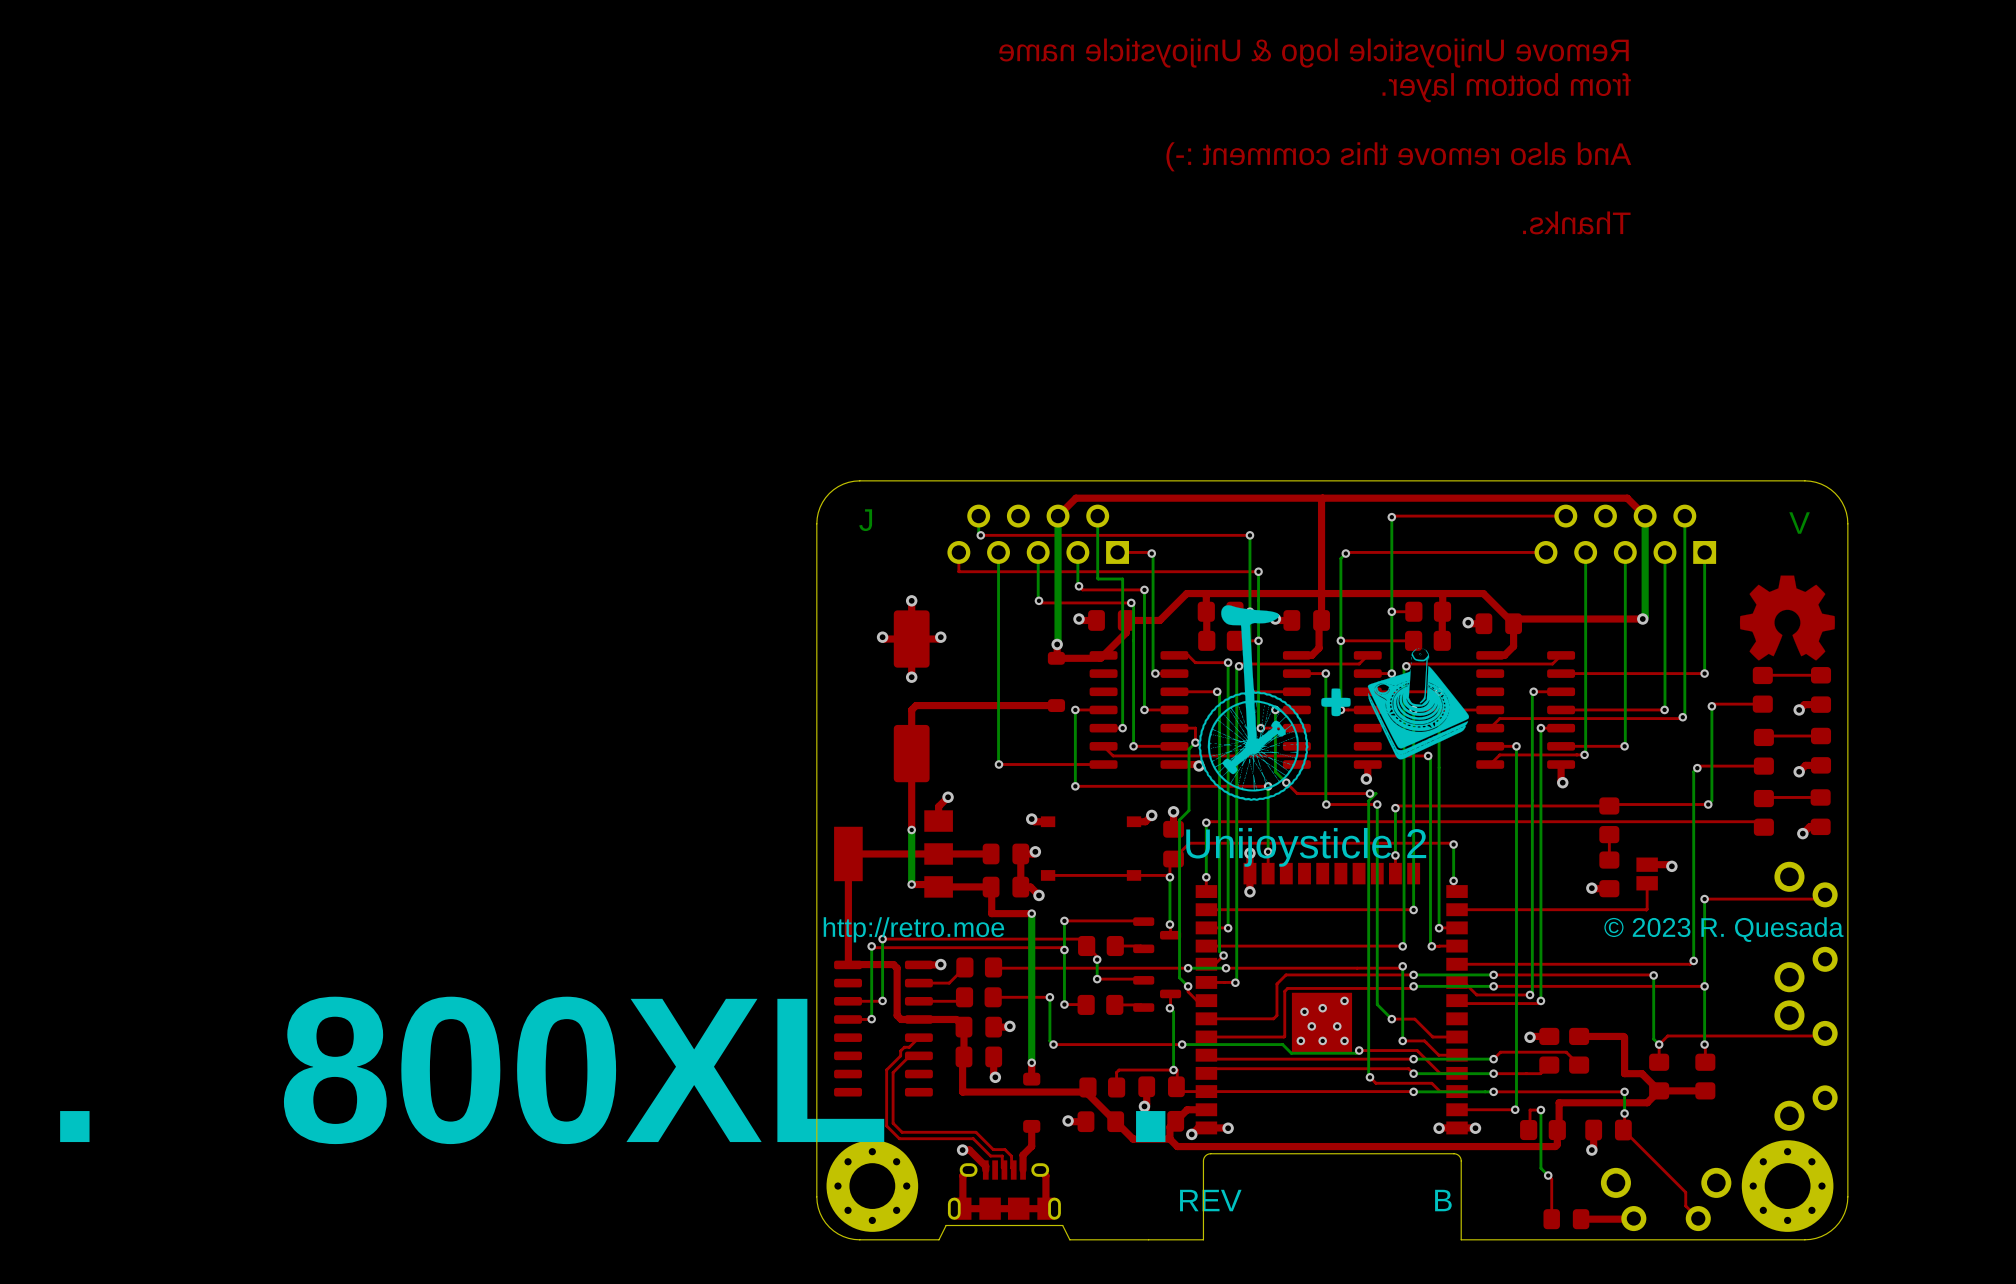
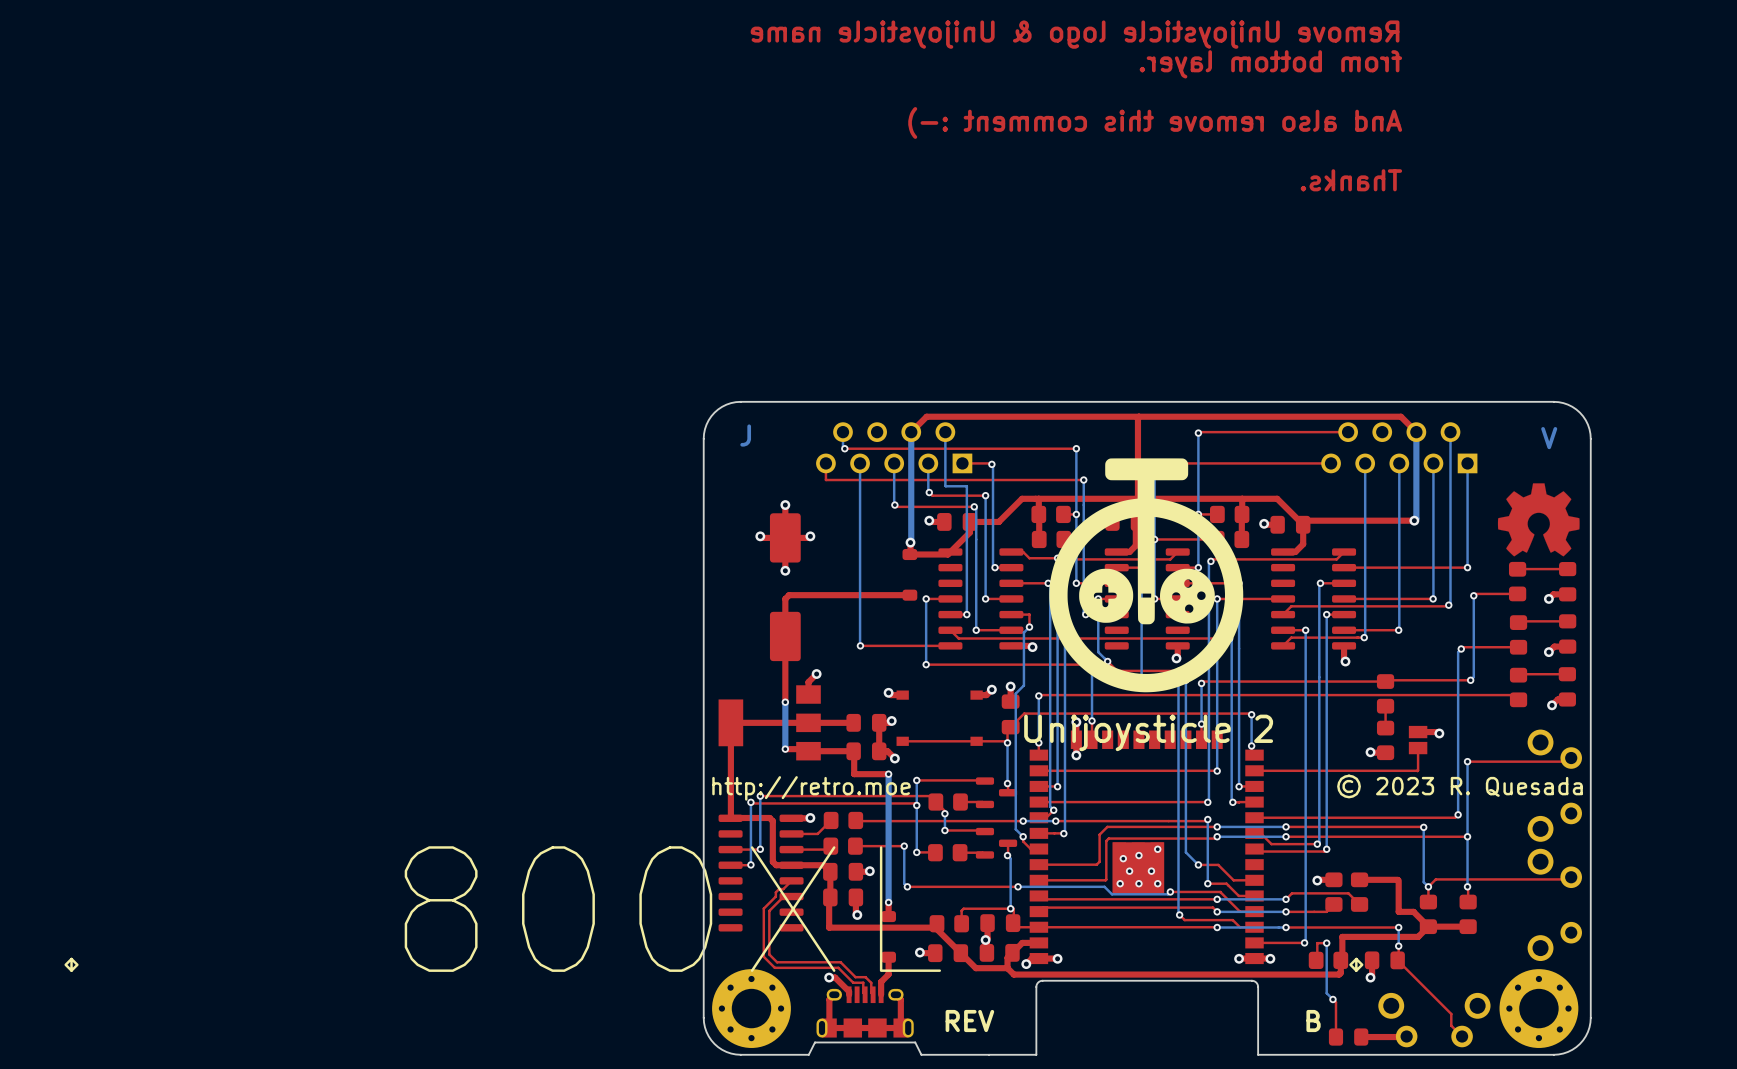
drawing: none -> [1049, 458, 1244, 693]
drawing: [1198, 605, 1470, 801] -> none
text position: Unijoysticle 2 (1306, 847) -> Unijoysticle 2 (1148, 732)

